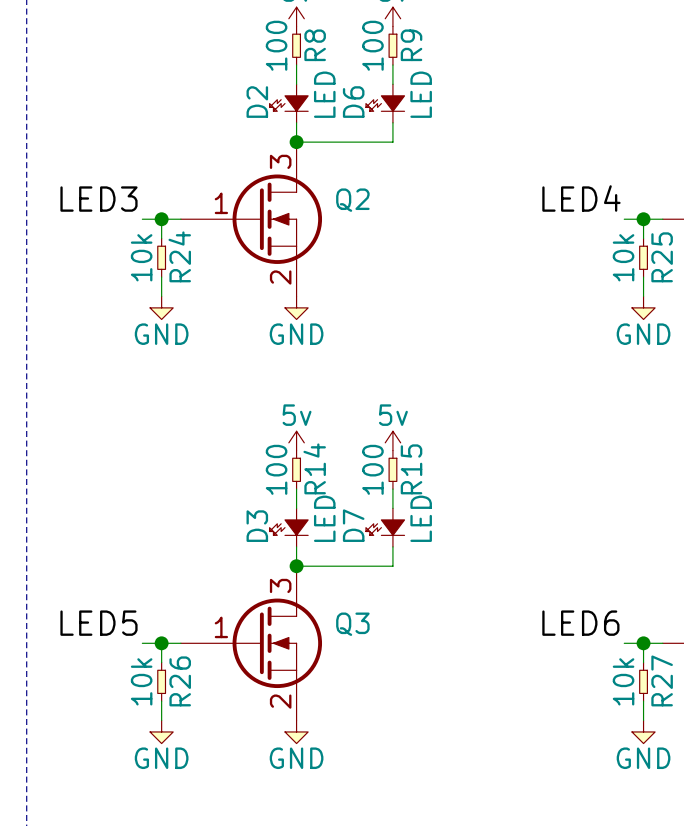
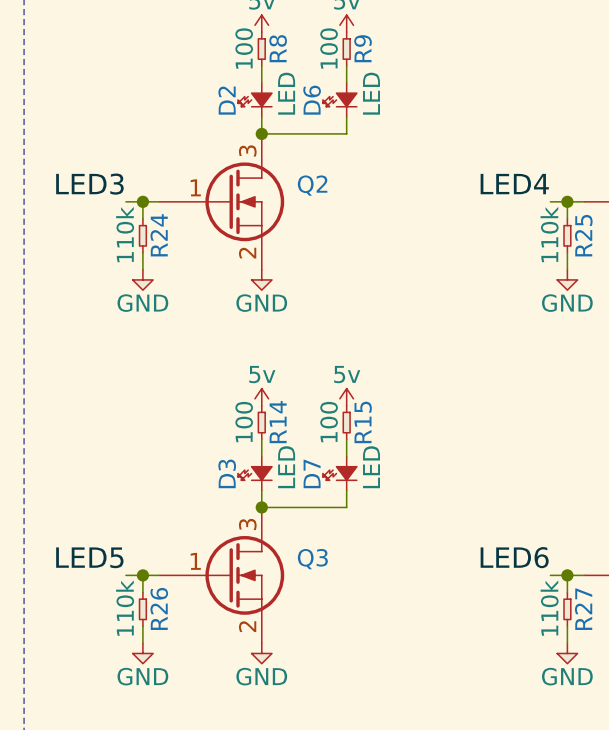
R24 value: 10k (141, 257) -> 110k (125, 234)
R25 value: 10k (623, 257) -> 110k (549, 234)
R26 value: 10k (141, 681) -> 110k (125, 608)
R27 value: 10k (623, 681) -> 110k (549, 608)

